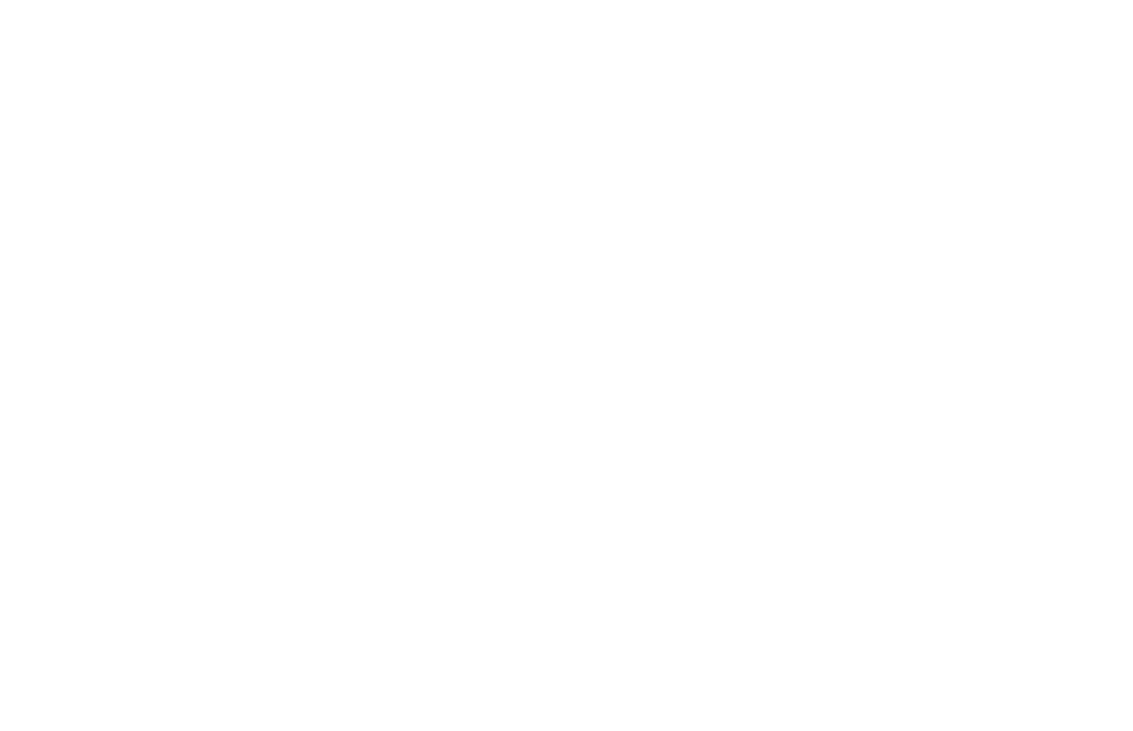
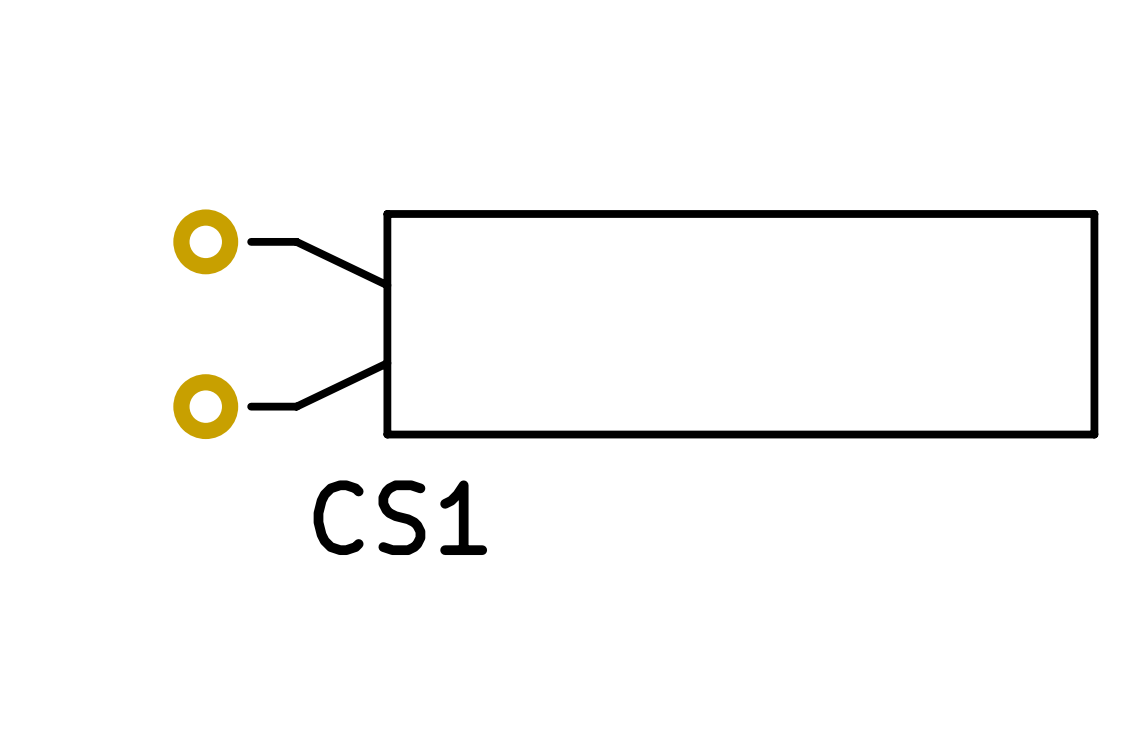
CS1: none -> (635, 324)

